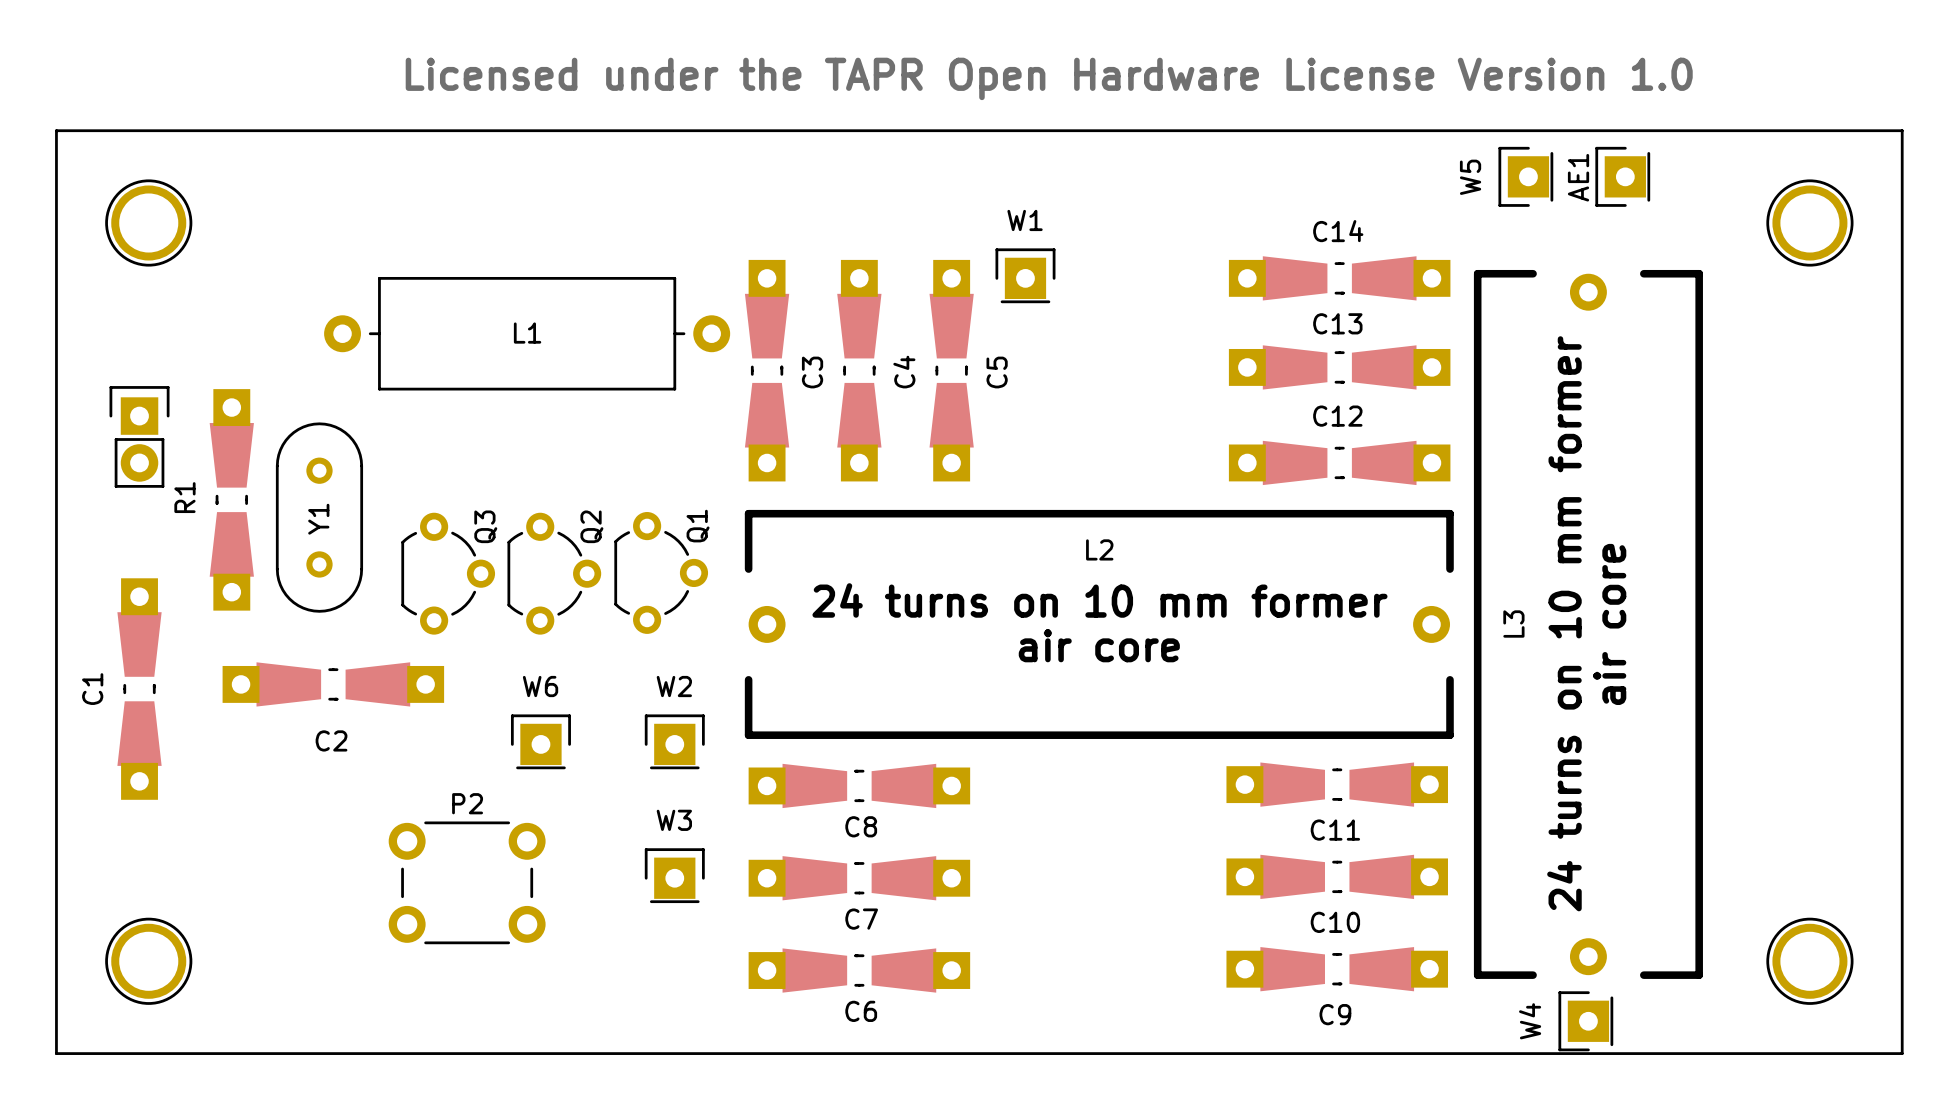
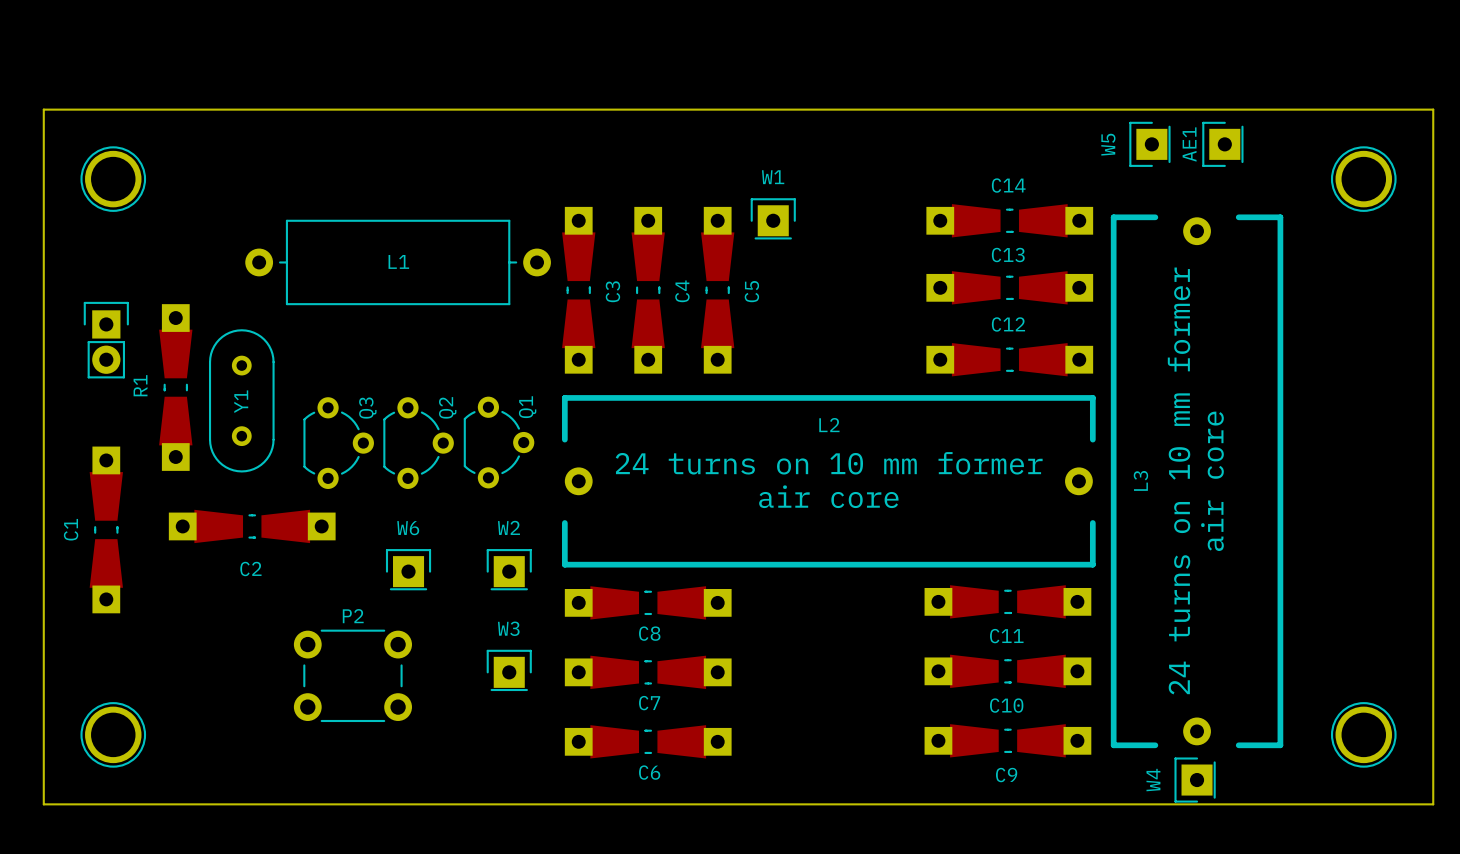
text: Licensed under the TAPR Open Hardware License Version 1.0 (1049, 78) -> none

